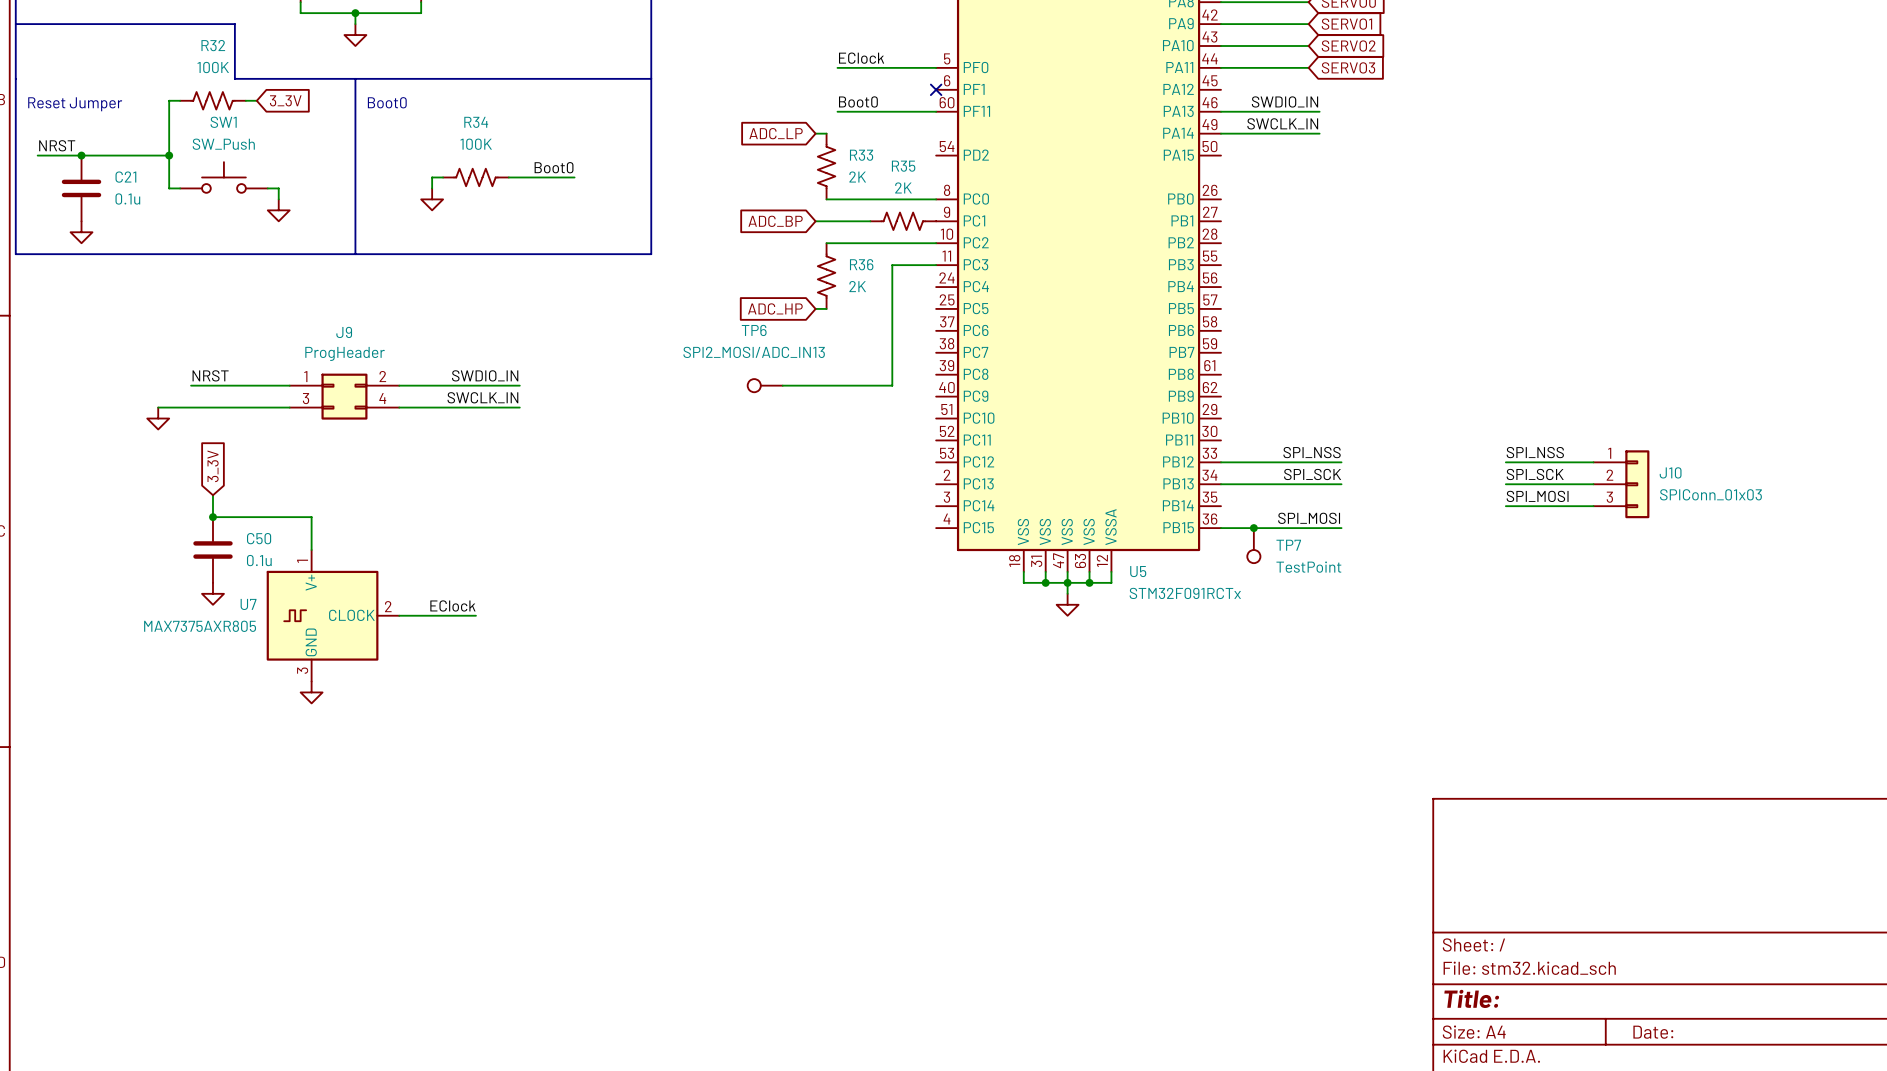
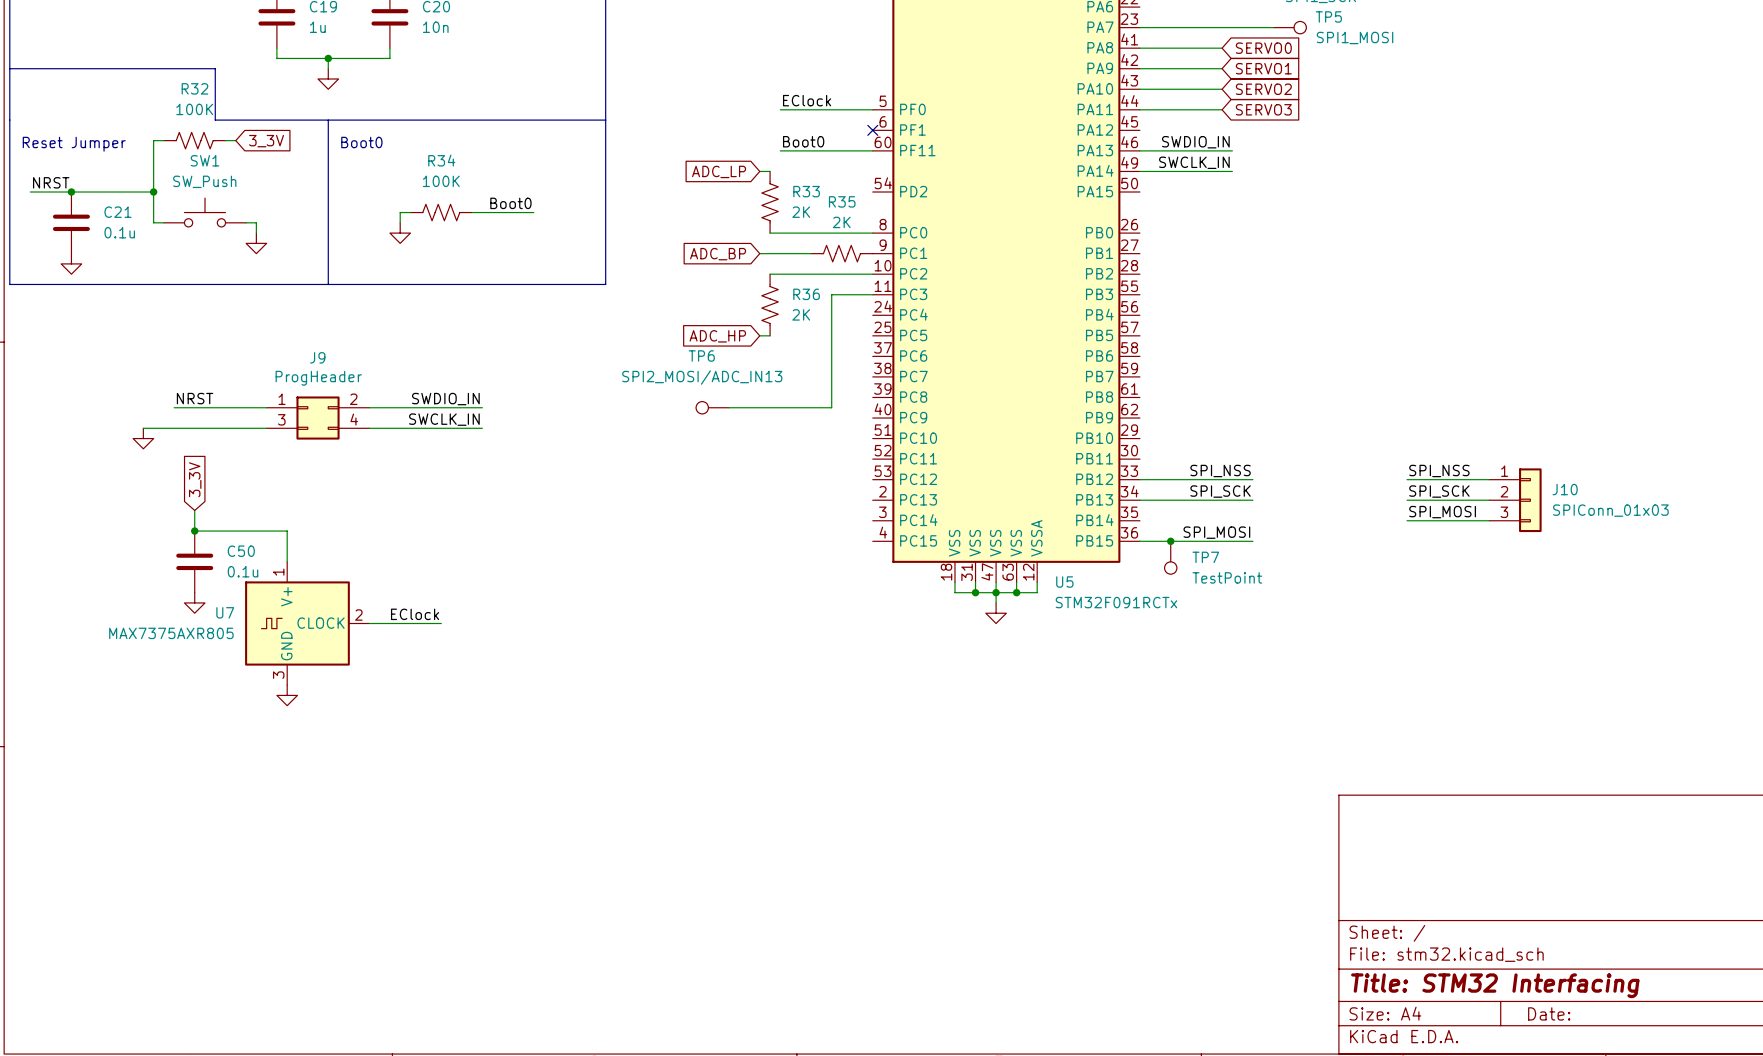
title block: Title: (1471, 998) -> Title: STM32 Interfacing (1495, 985)

